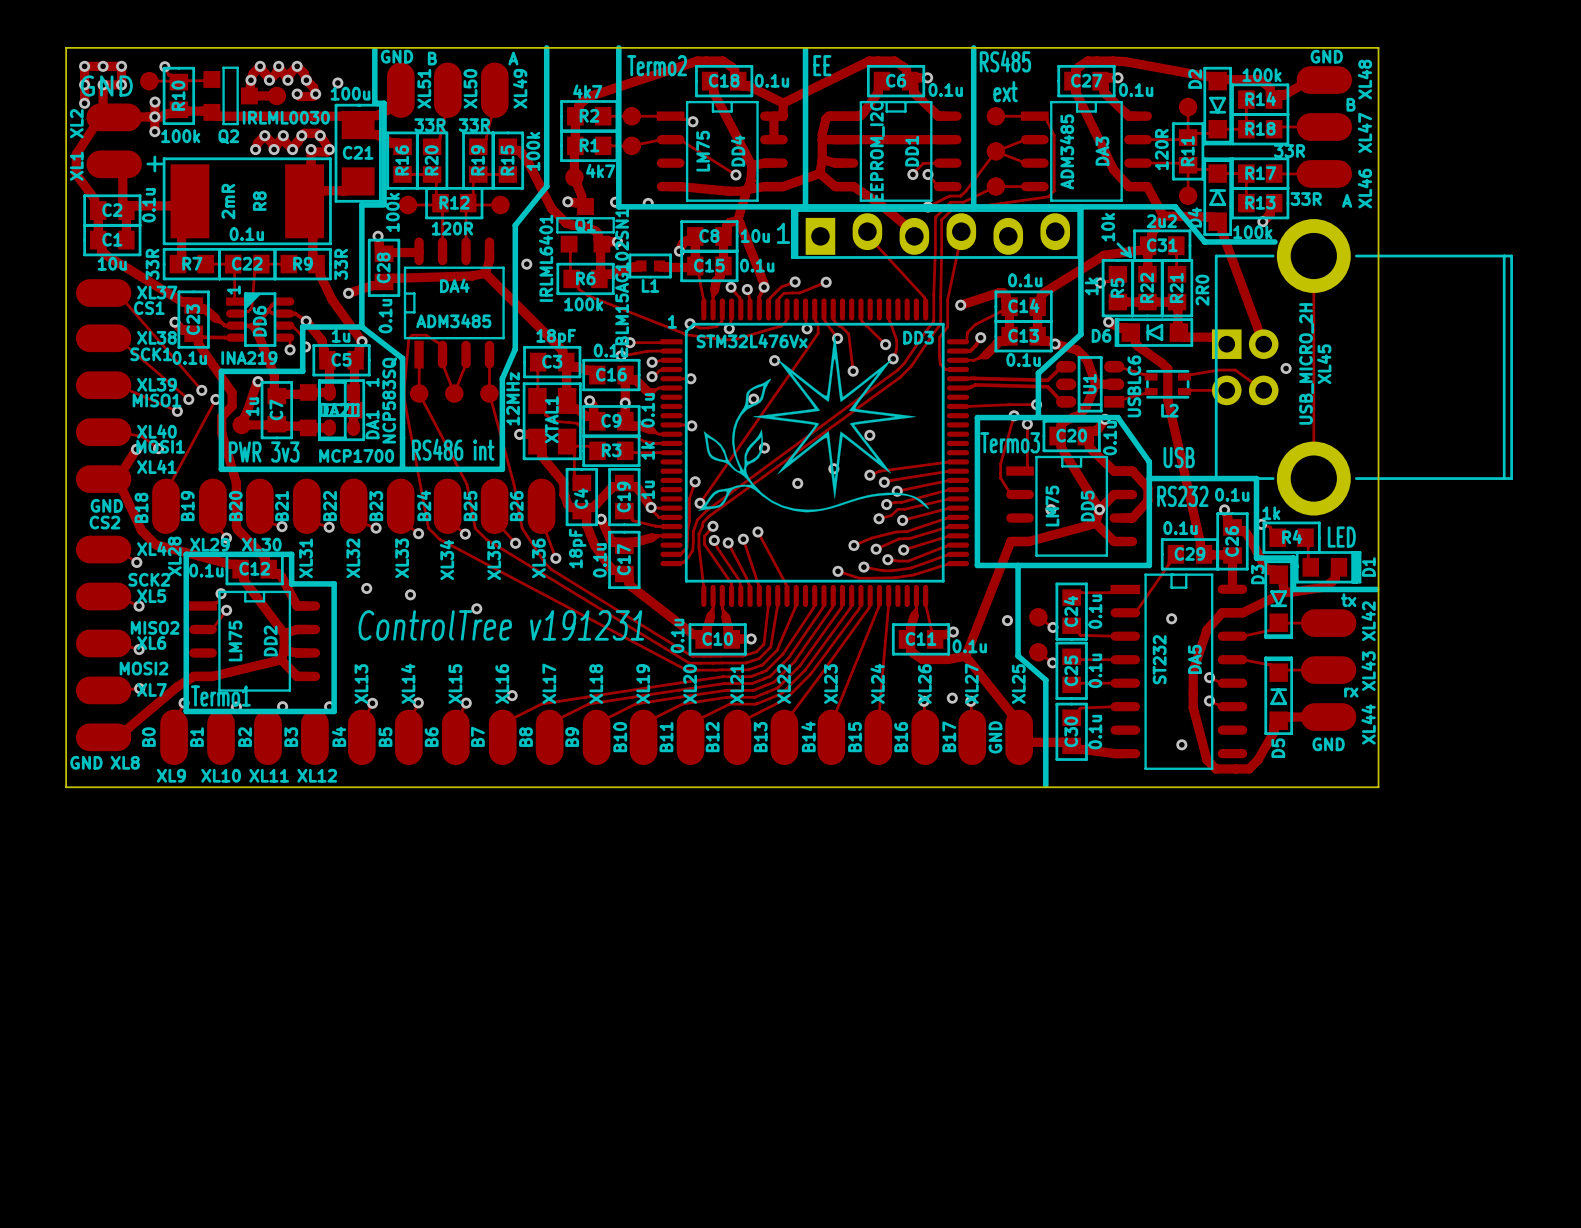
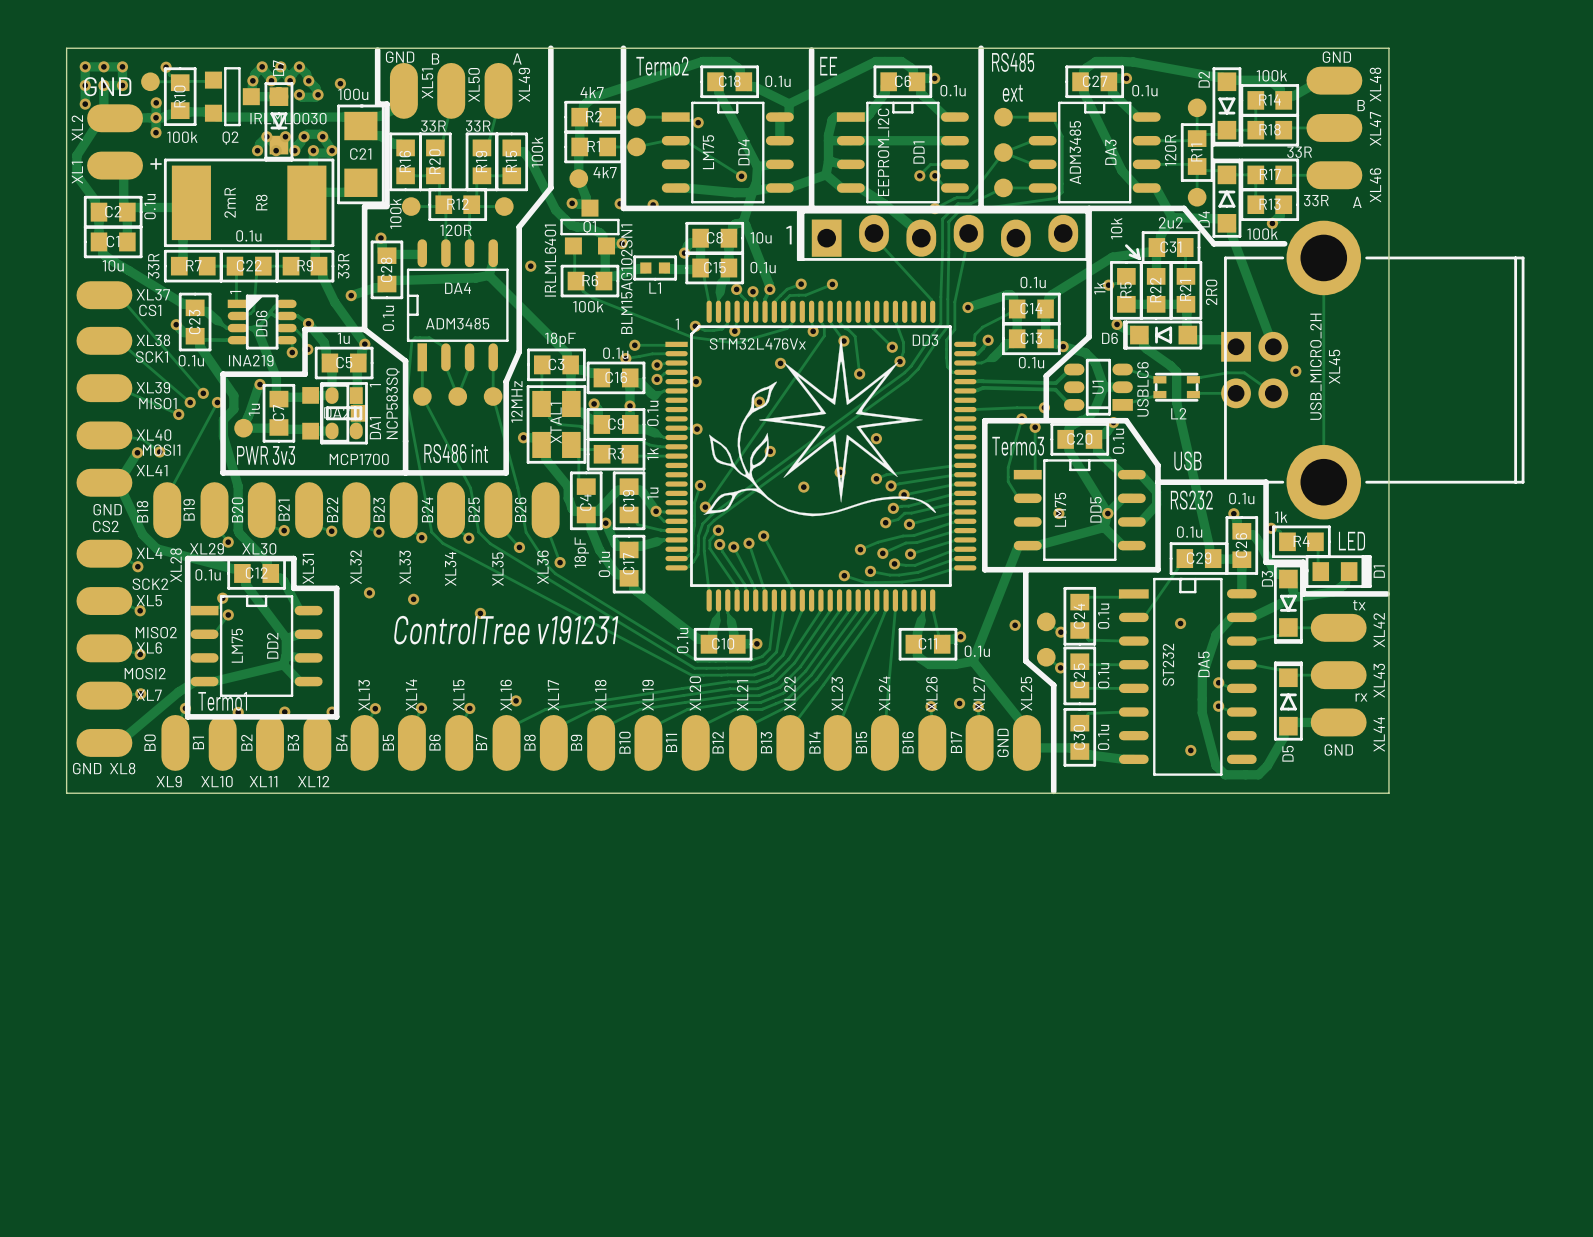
D7: none -> (278, 121)

